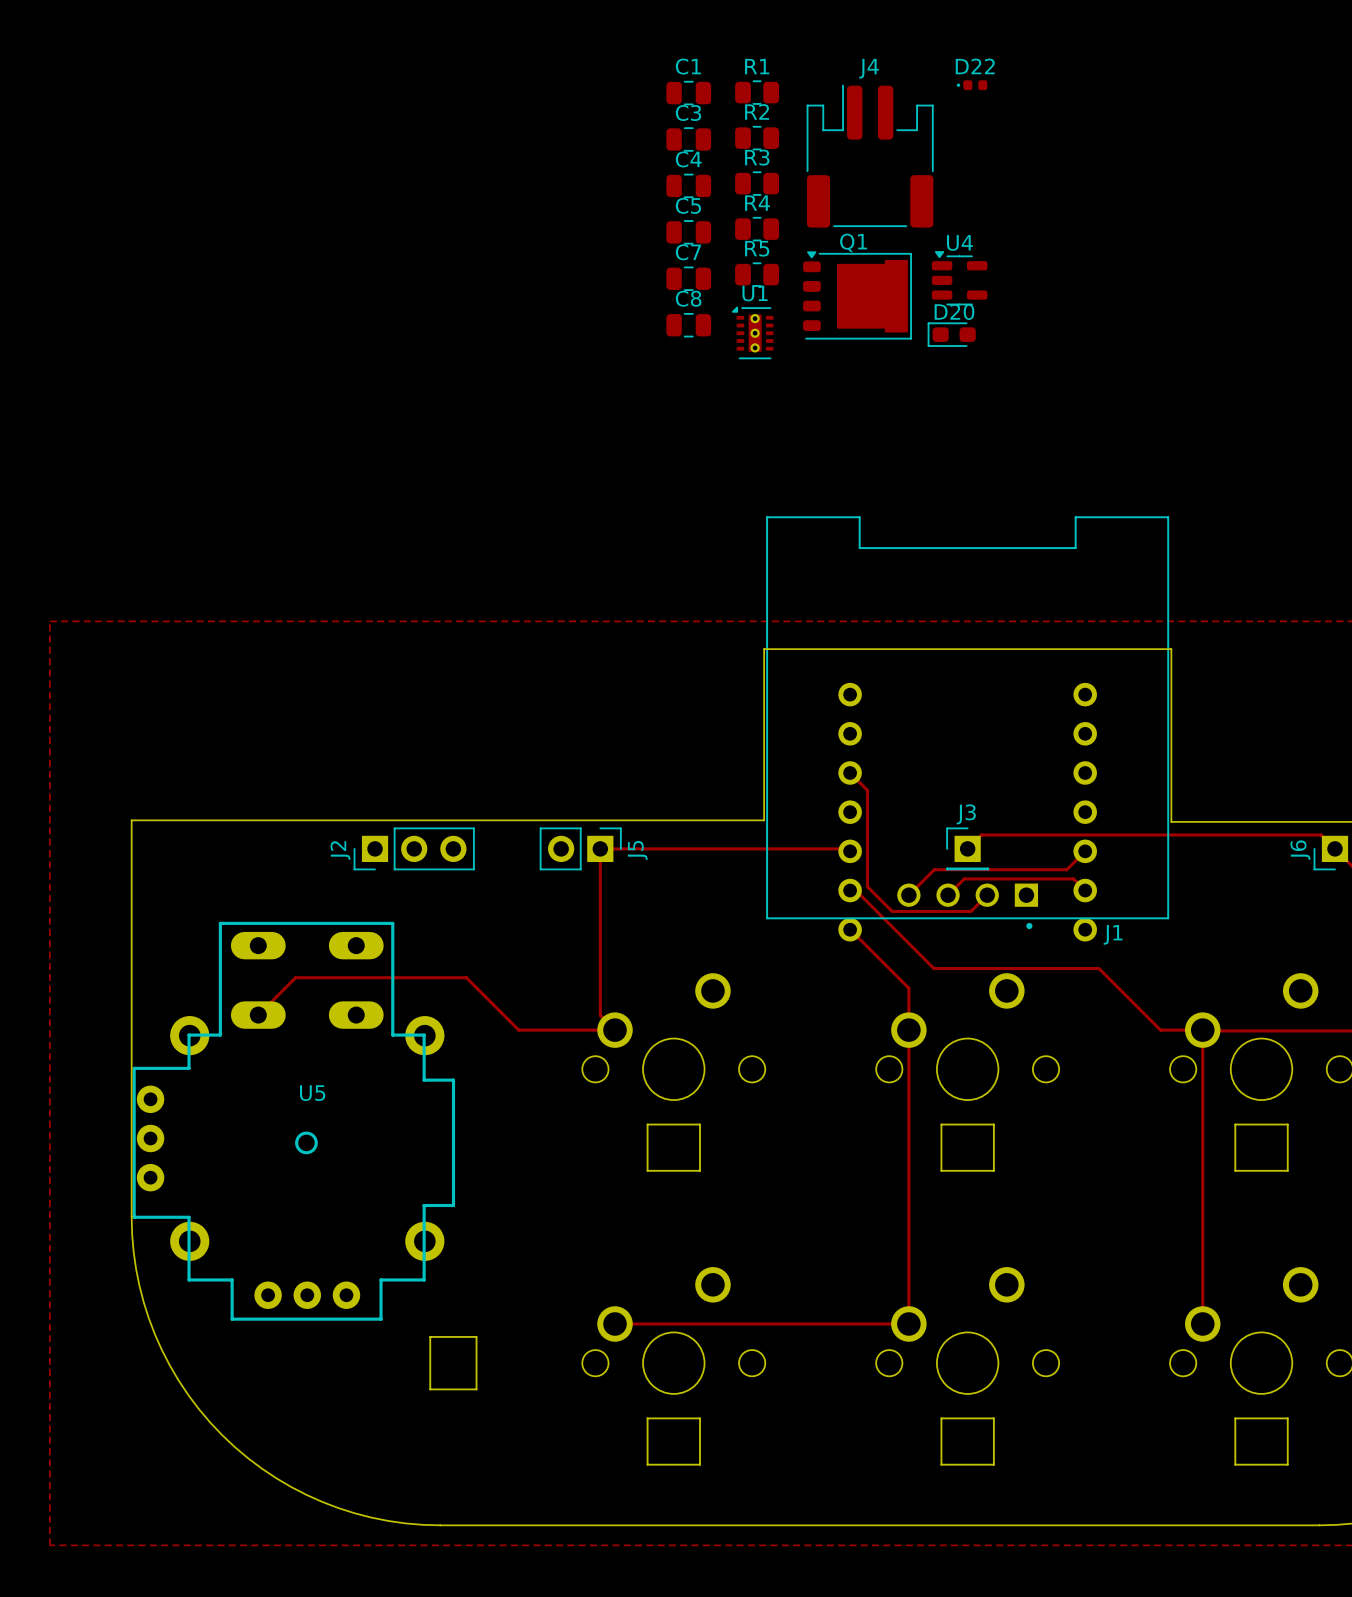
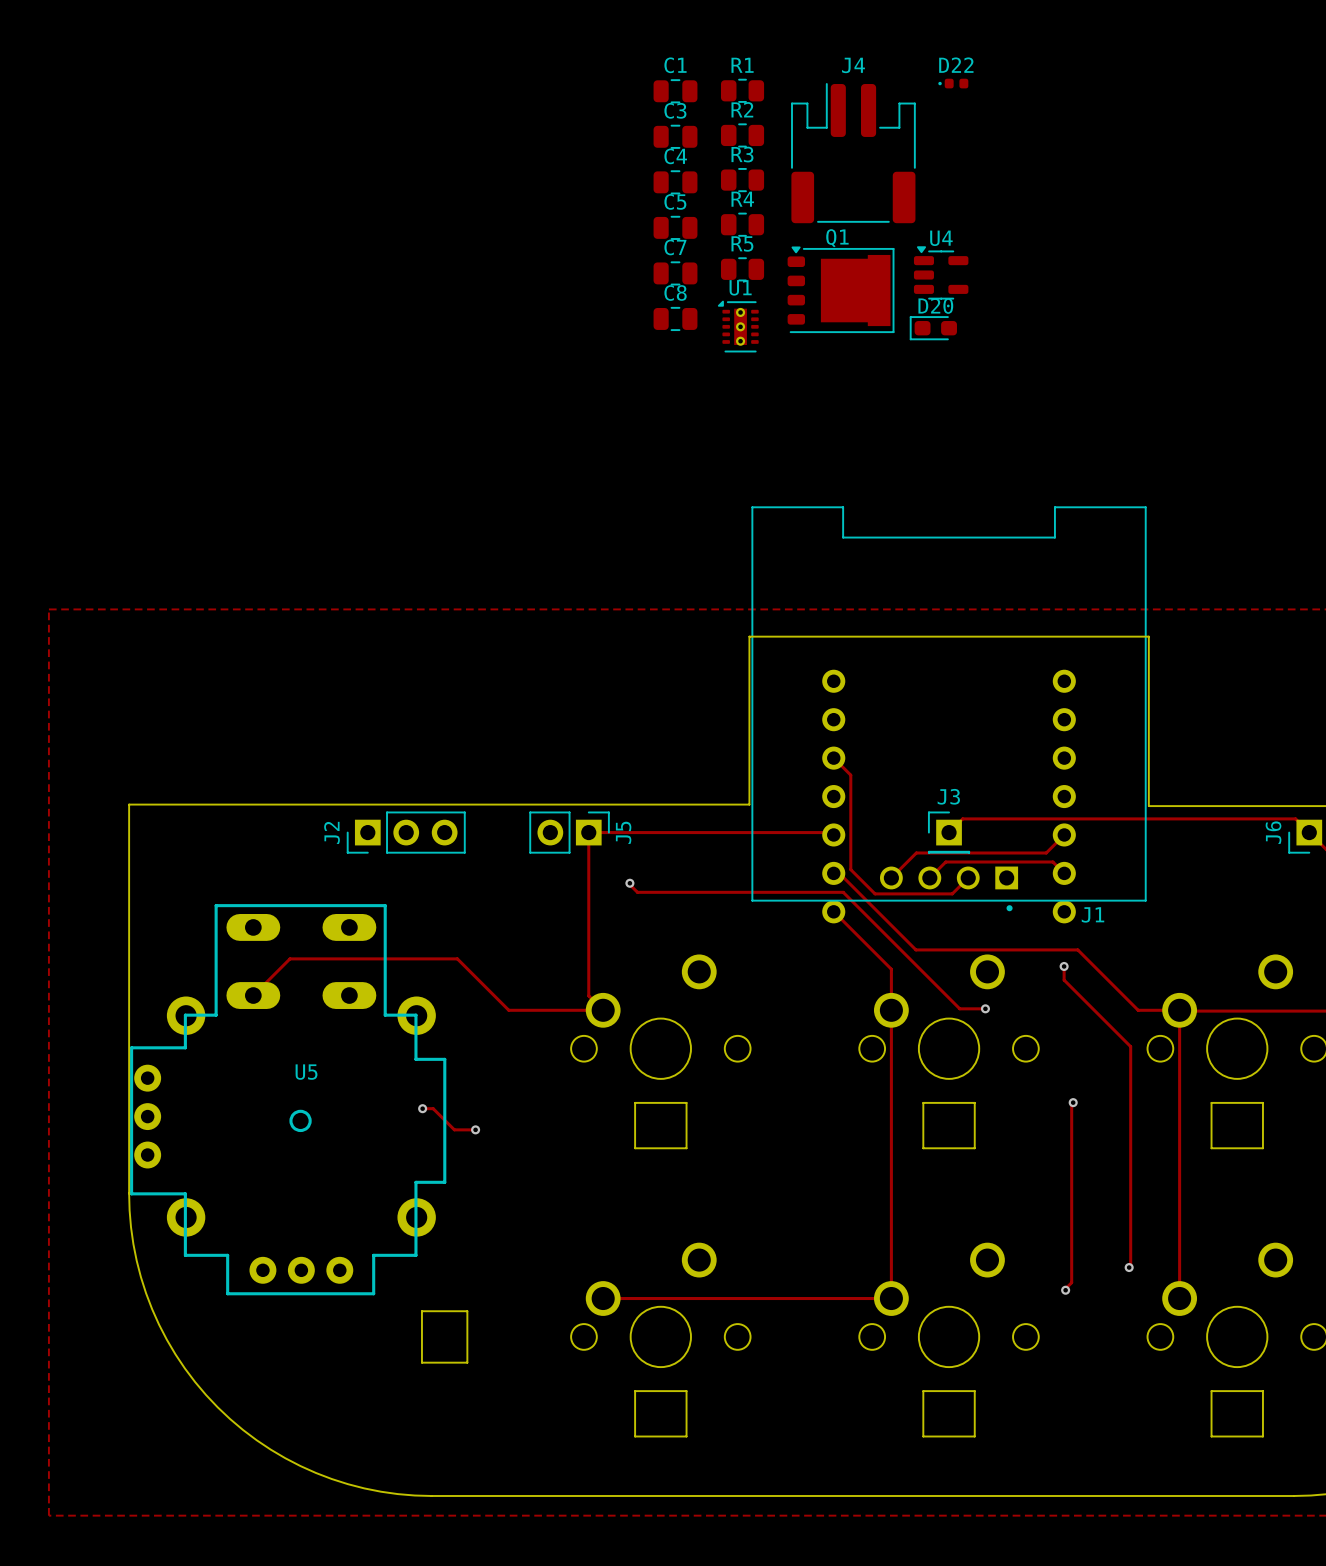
track: none -> (629, 883) (637, 892) (843, 892) (959, 1008) (985, 1008)
via: none -> (629, 883)
track: none -> (1064, 966) (1064, 980) (1130, 1046) (1130, 1266) (1129, 1267)
via: none -> (1064, 966)
via: none -> (985, 1008)
track: none -> (1073, 1102) (1071, 1104) (1071, 1282) (1065, 1290)
via: none -> (1073, 1102)
track: none -> (422, 1108) (433, 1108) (454, 1129) (475, 1129)
via: none -> (422, 1108)
via: none -> (475, 1129)
via: none -> (1129, 1267)
via: none -> (1065, 1290)

